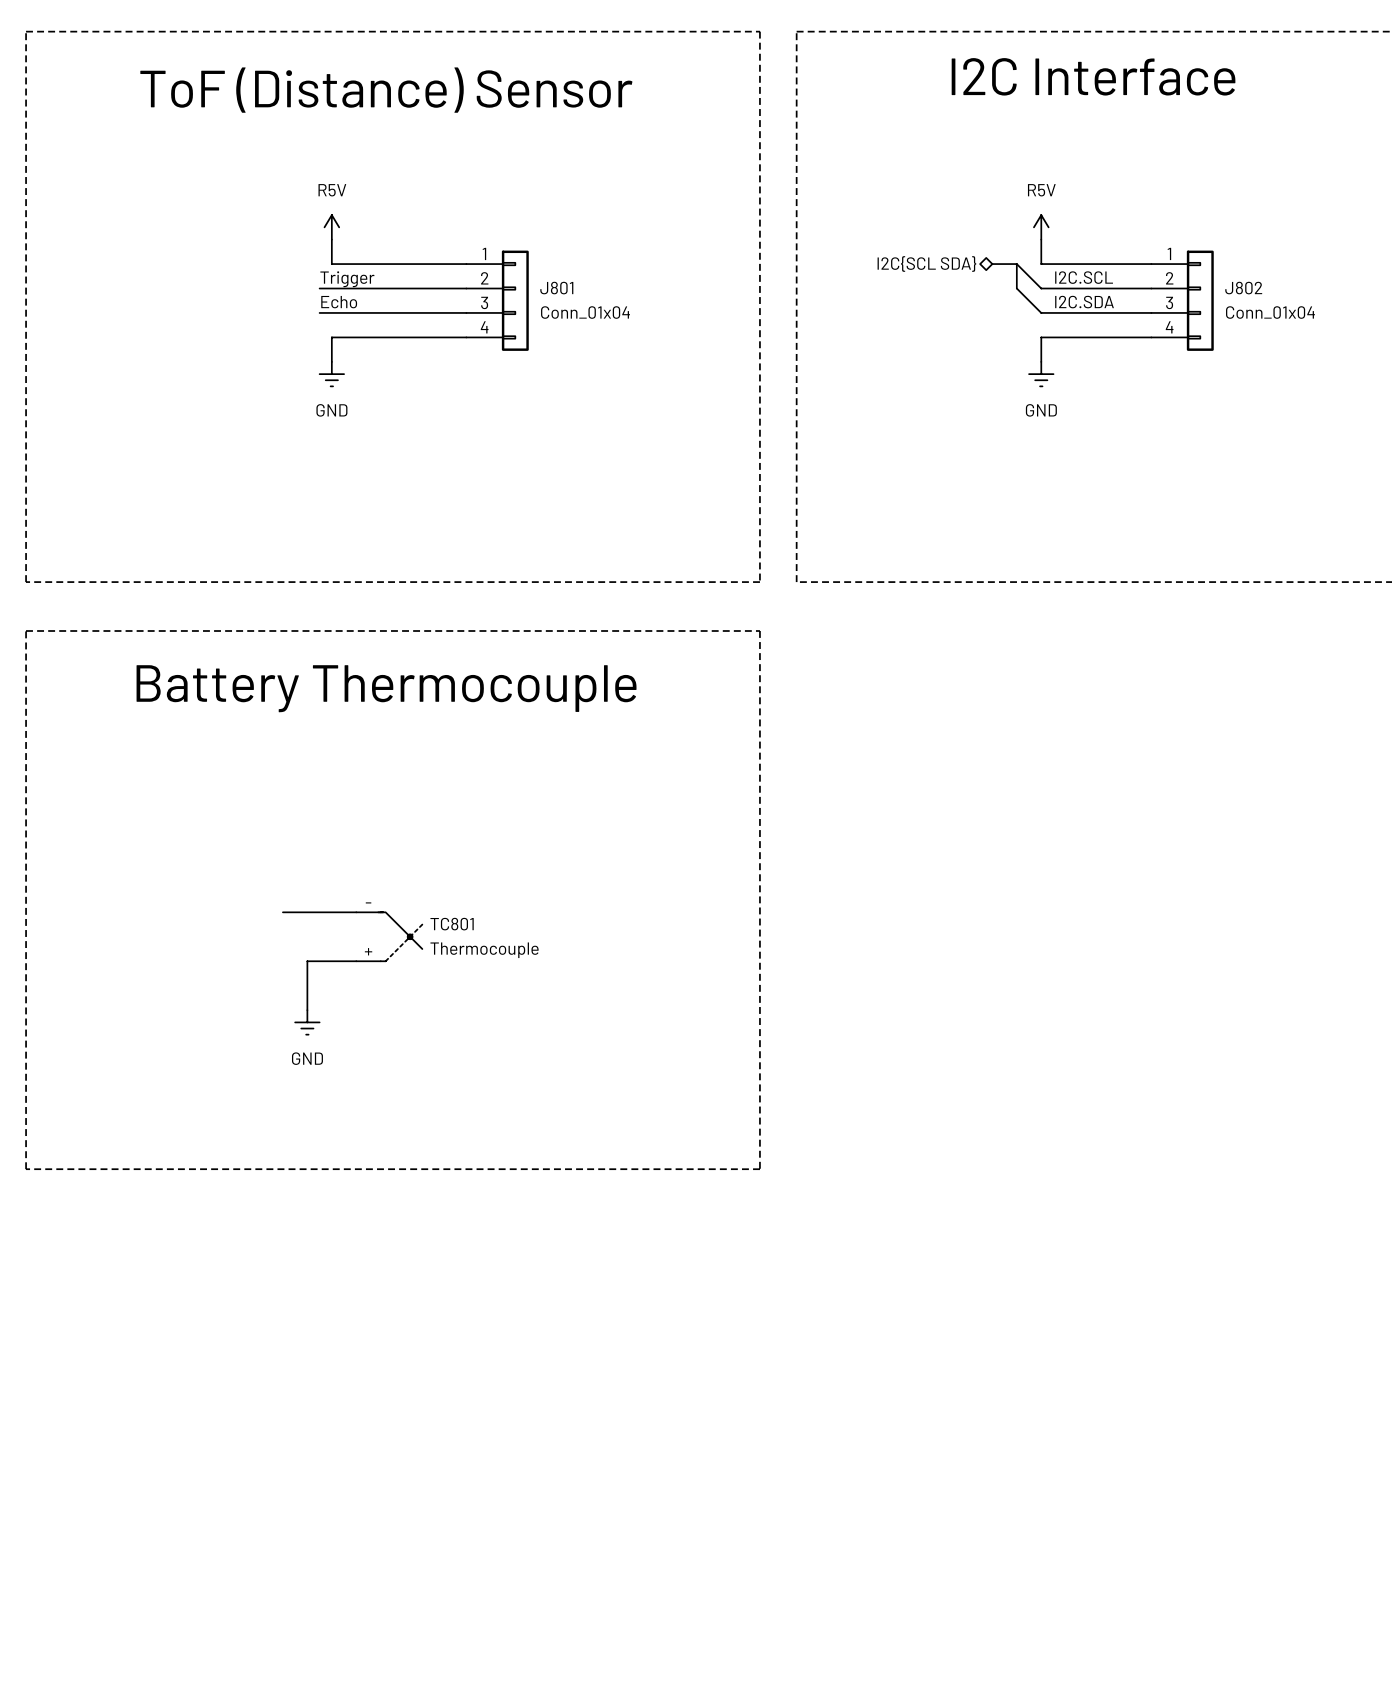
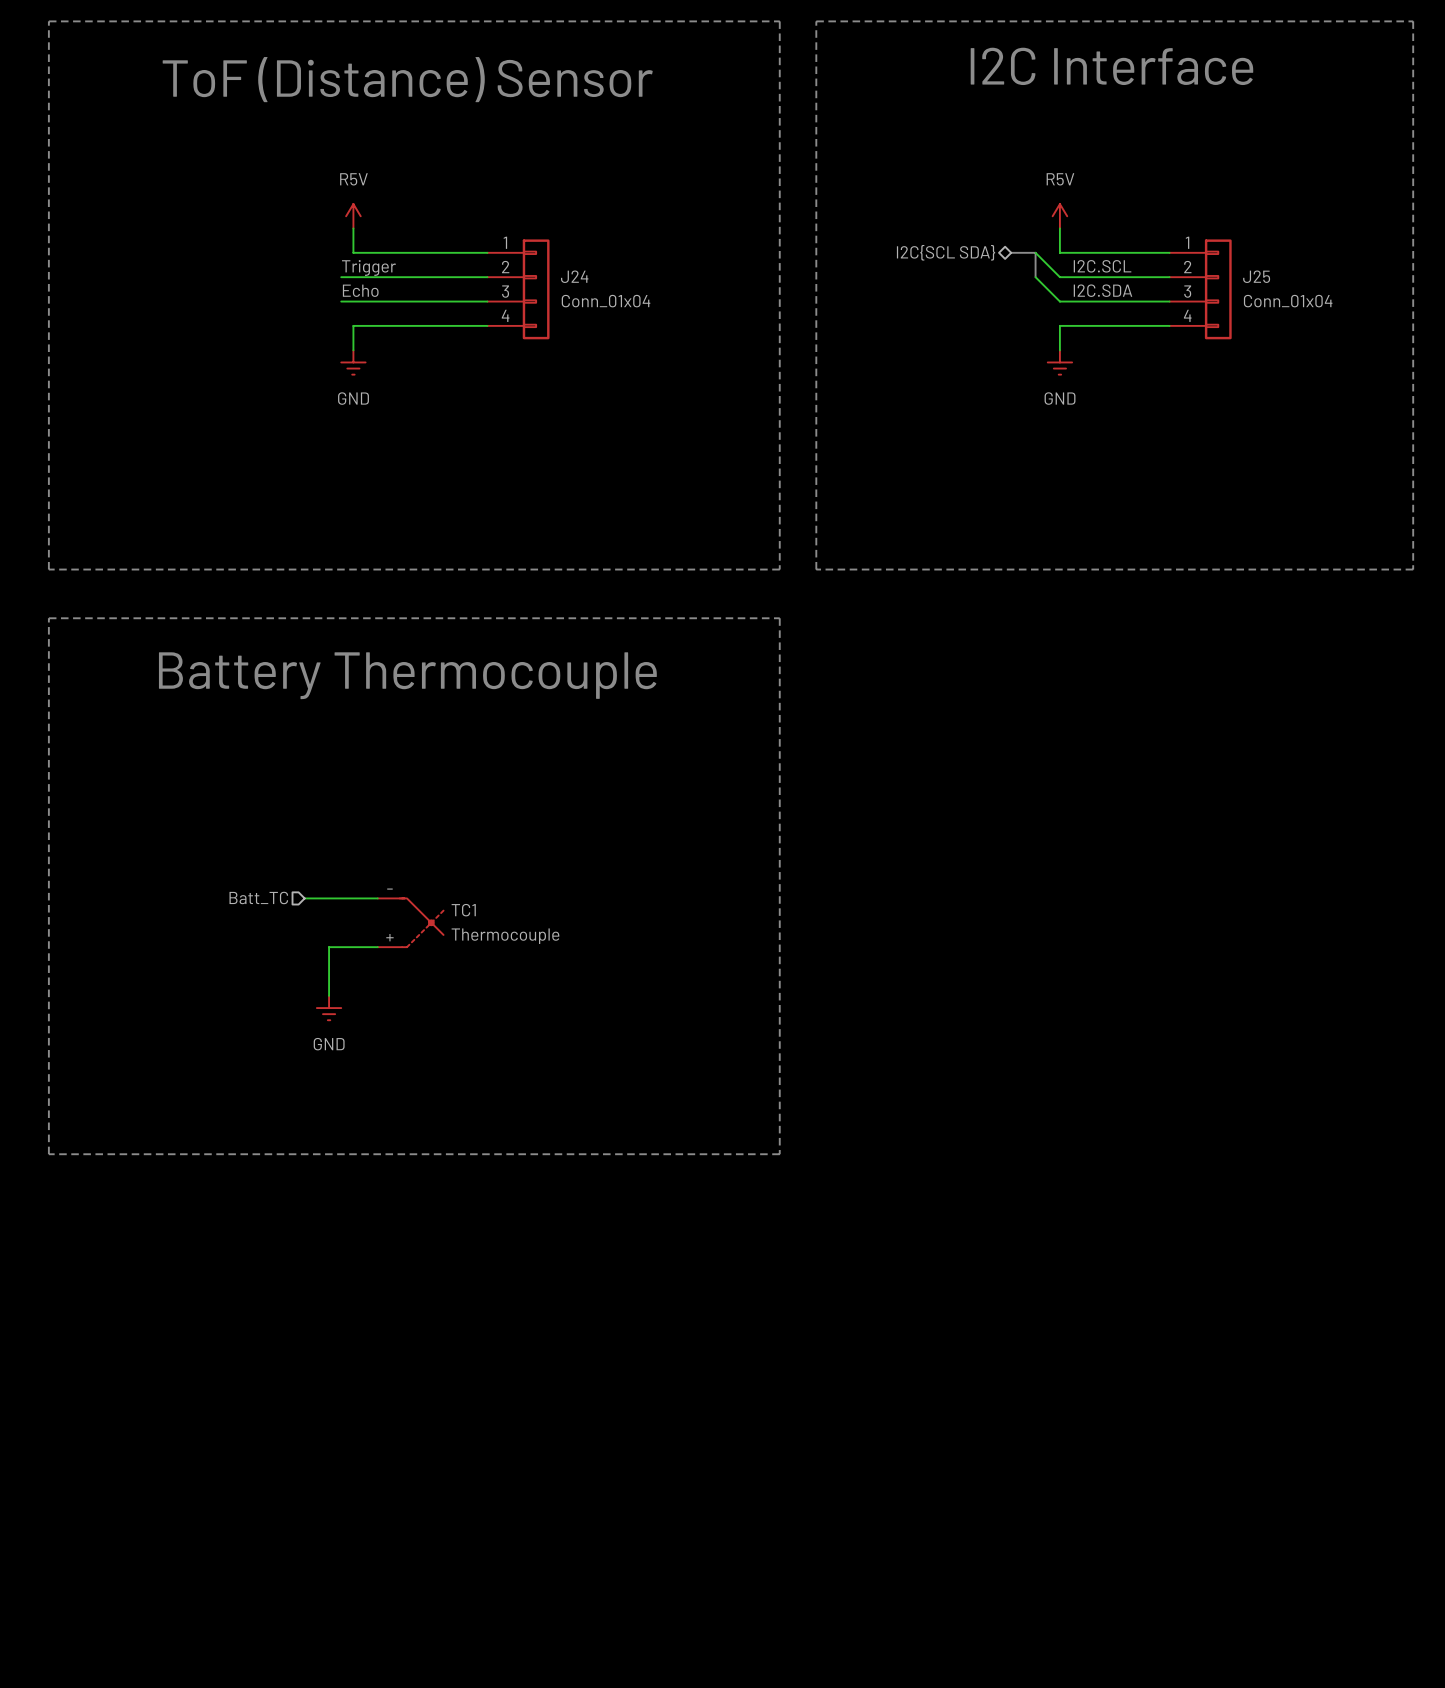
J801 name: J801 (556, 288) -> J24 (574, 276)
J802 name: J802 (1243, 288) -> J25 (1256, 276)
hierarchical label: none -> Batt_TC (258, 897)
TC801 name: TC801 (452, 924) -> TC1 (463, 910)

